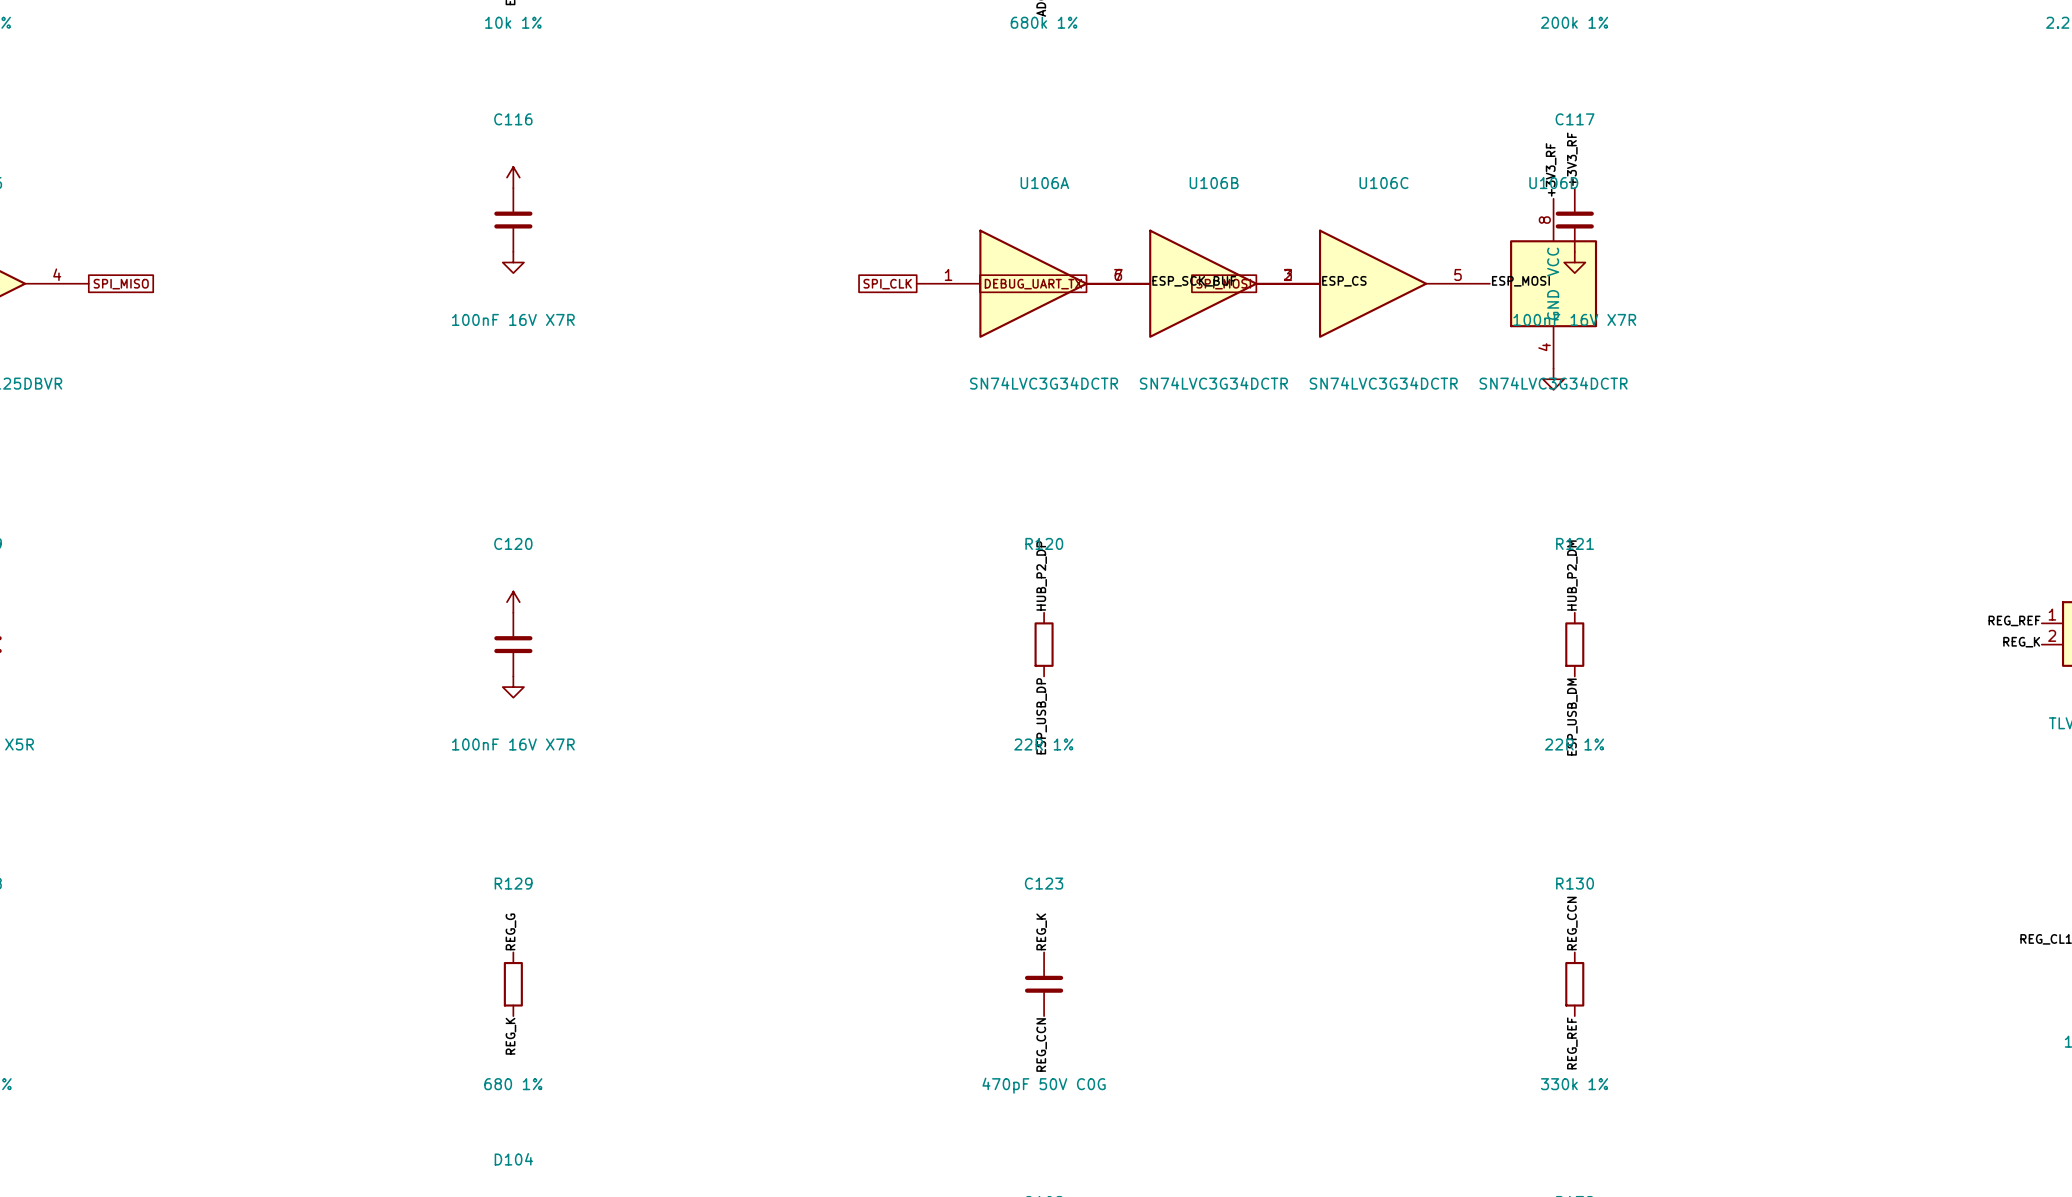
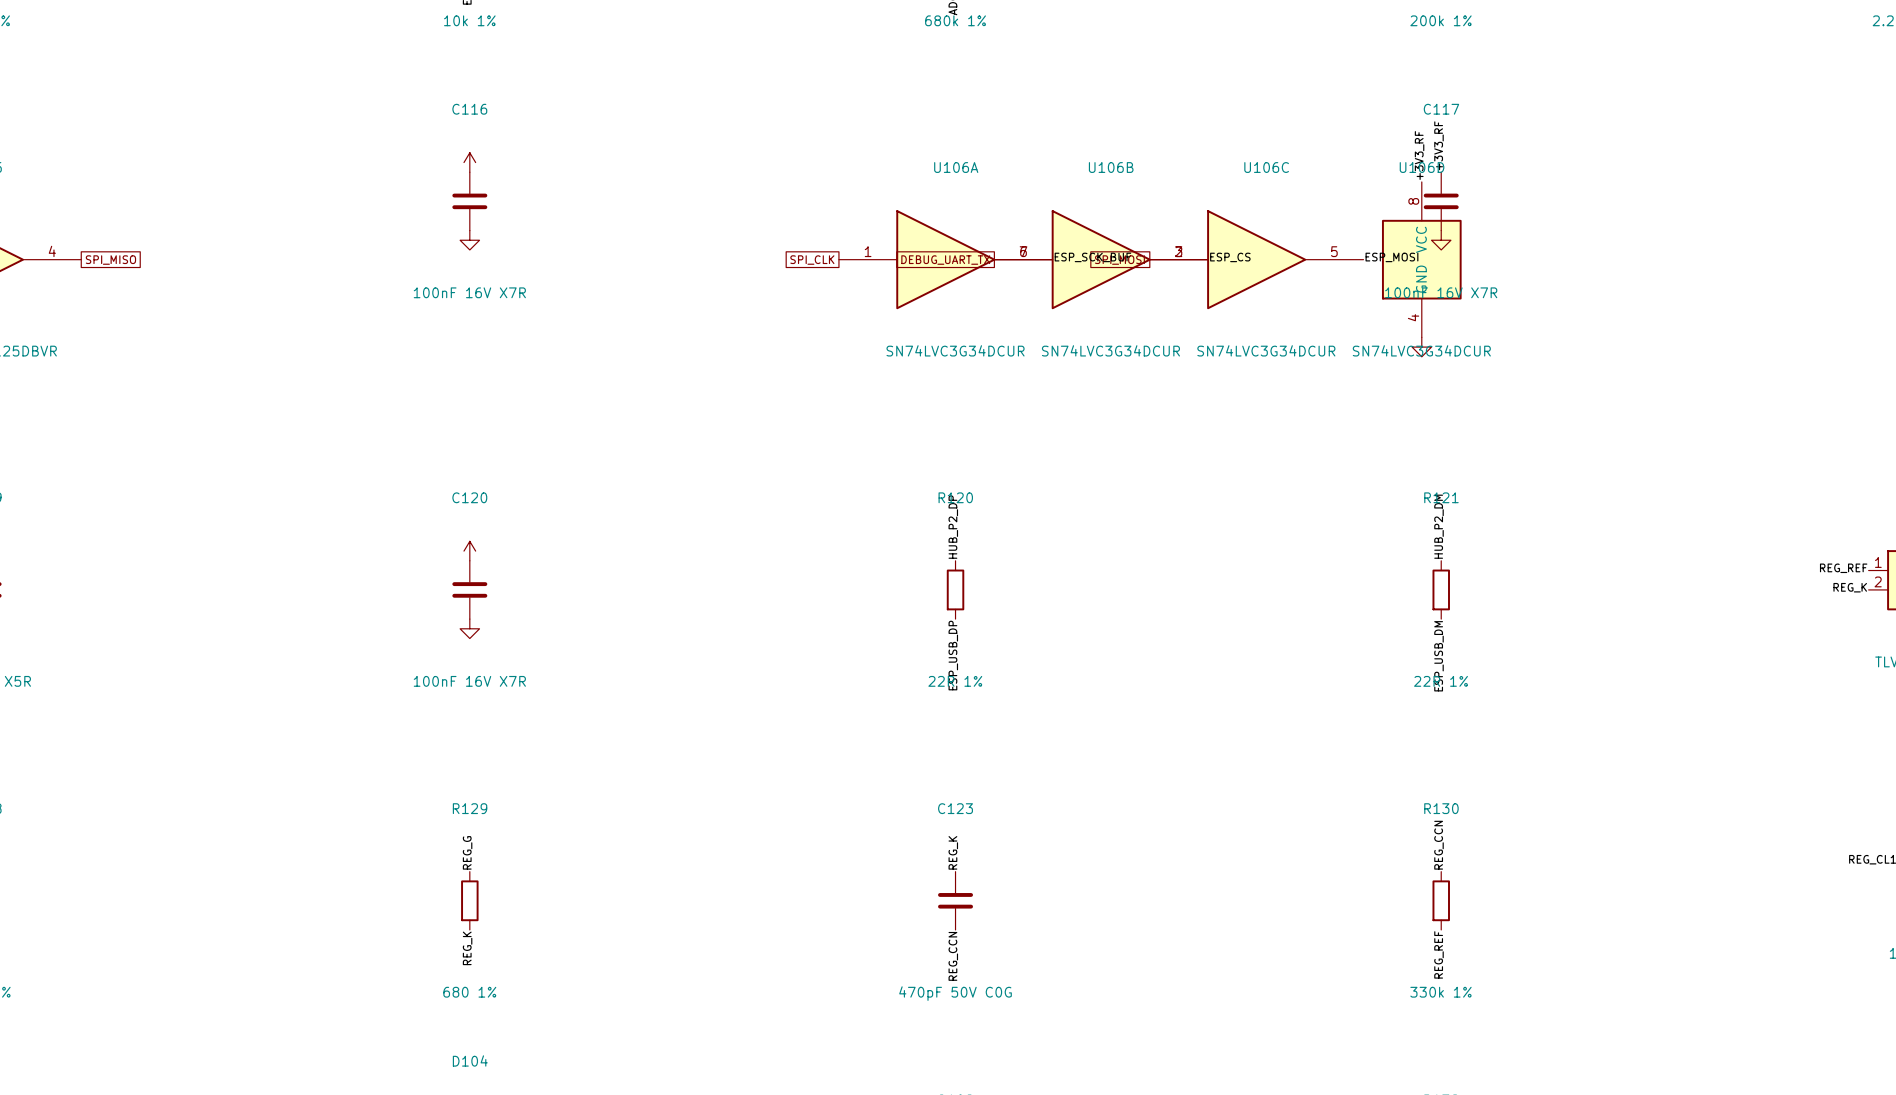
U106A value: SN74LVC3G34DCTR (1044, 383) -> SN74LVC3G34DCUR (955, 350)
U106B value: SN74LVC3G34DCTR (1213, 383) -> SN74LVC3G34DCUR (1110, 350)
U106C value: SN74LVC3G34DCTR (1383, 383) -> SN74LVC3G34DCUR (1266, 350)
U106D value: SN74LVC3G34DCTR (1553, 383) -> SN74LVC3G34DCUR (1421, 350)

